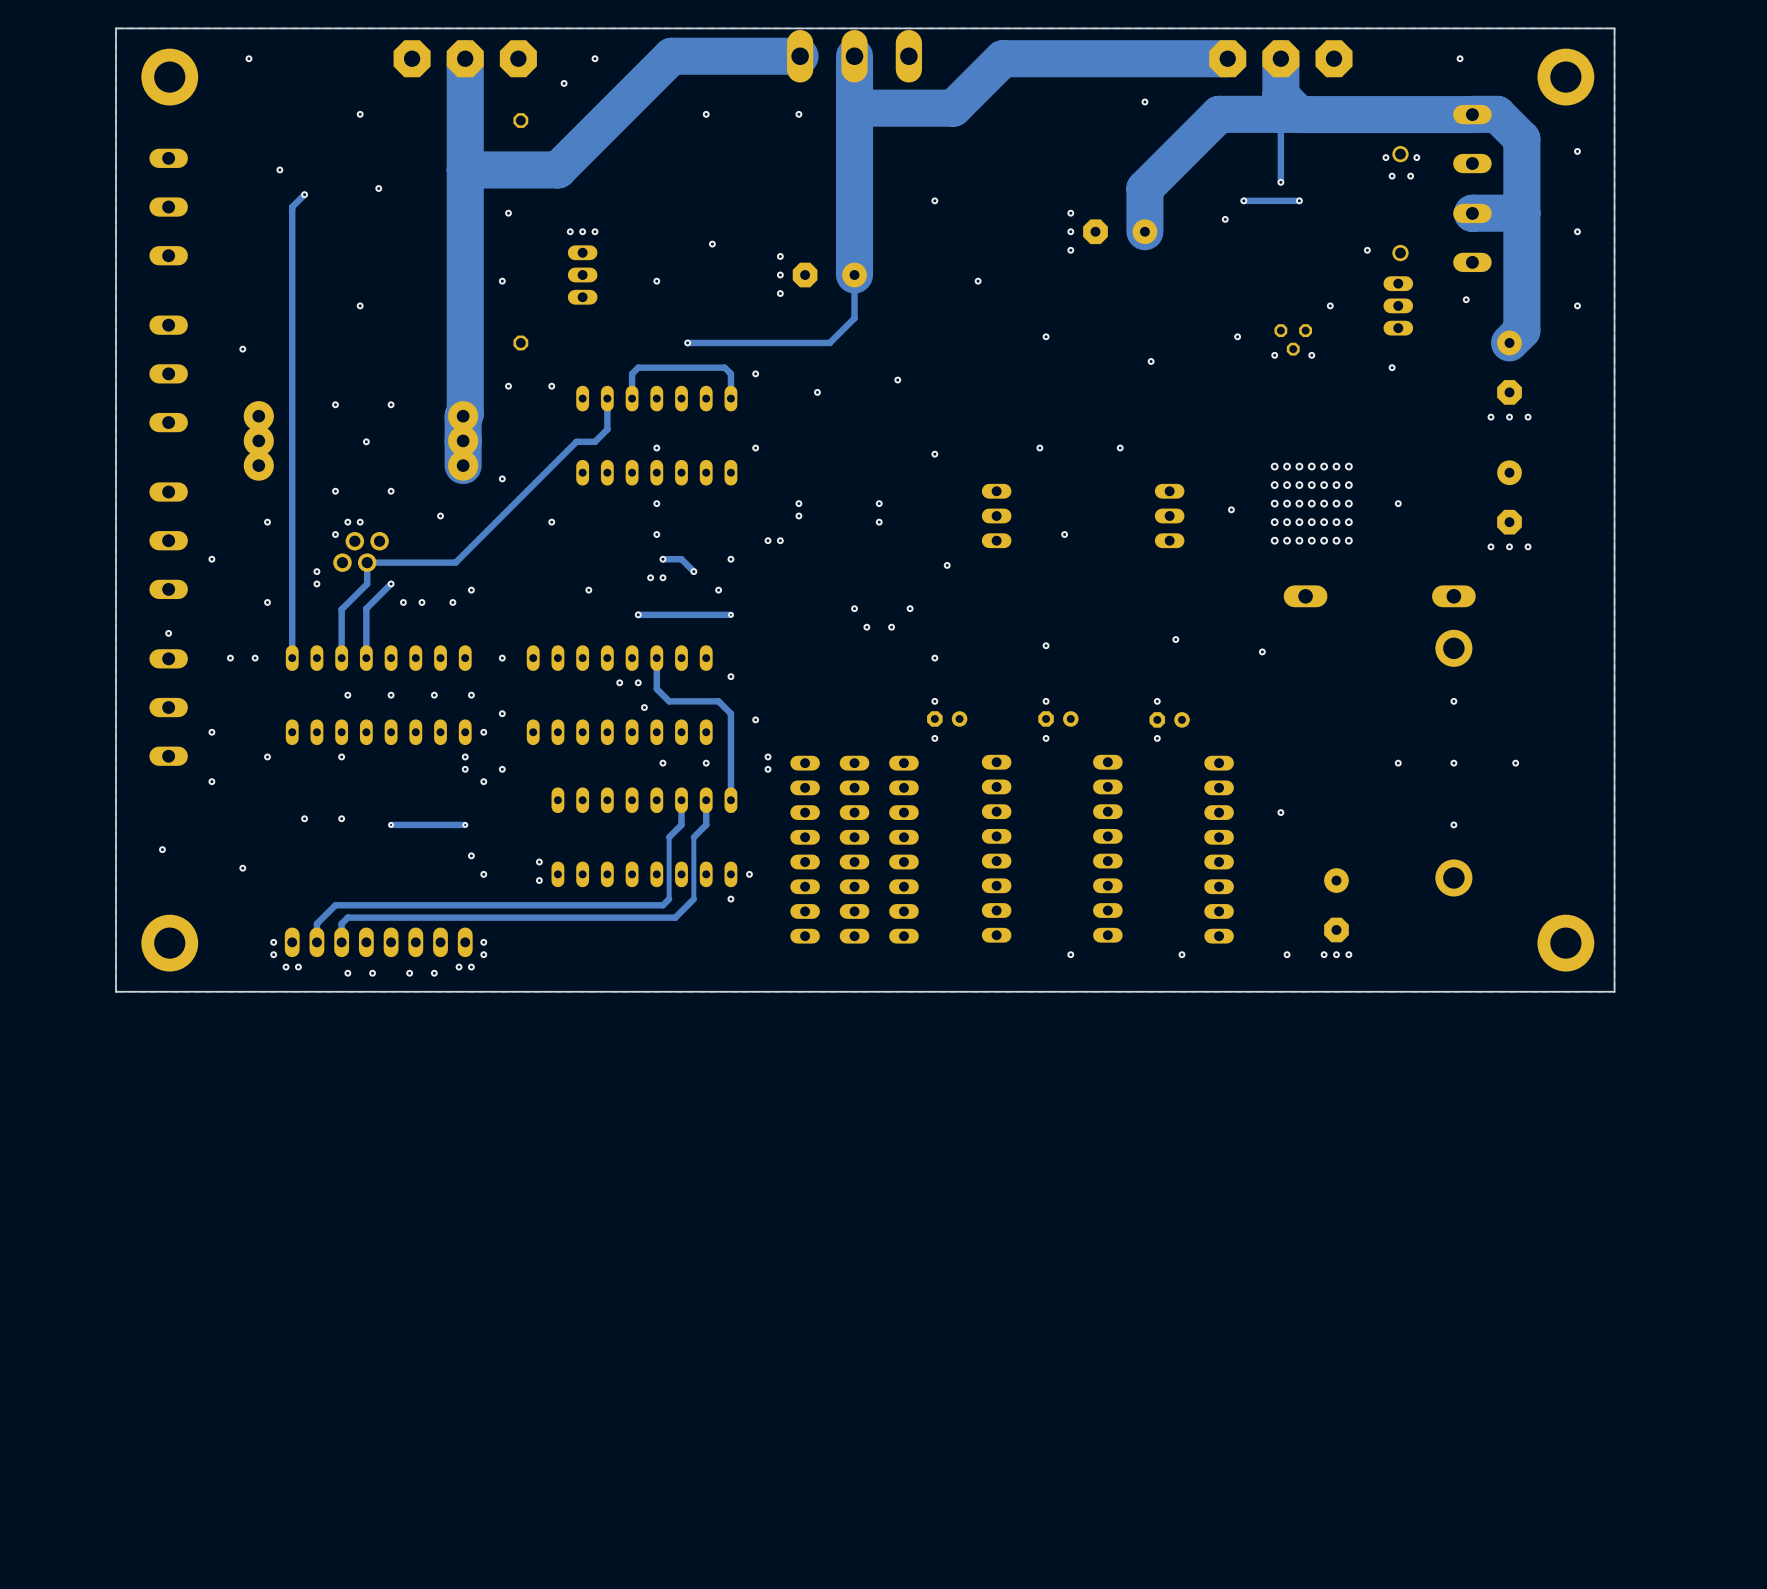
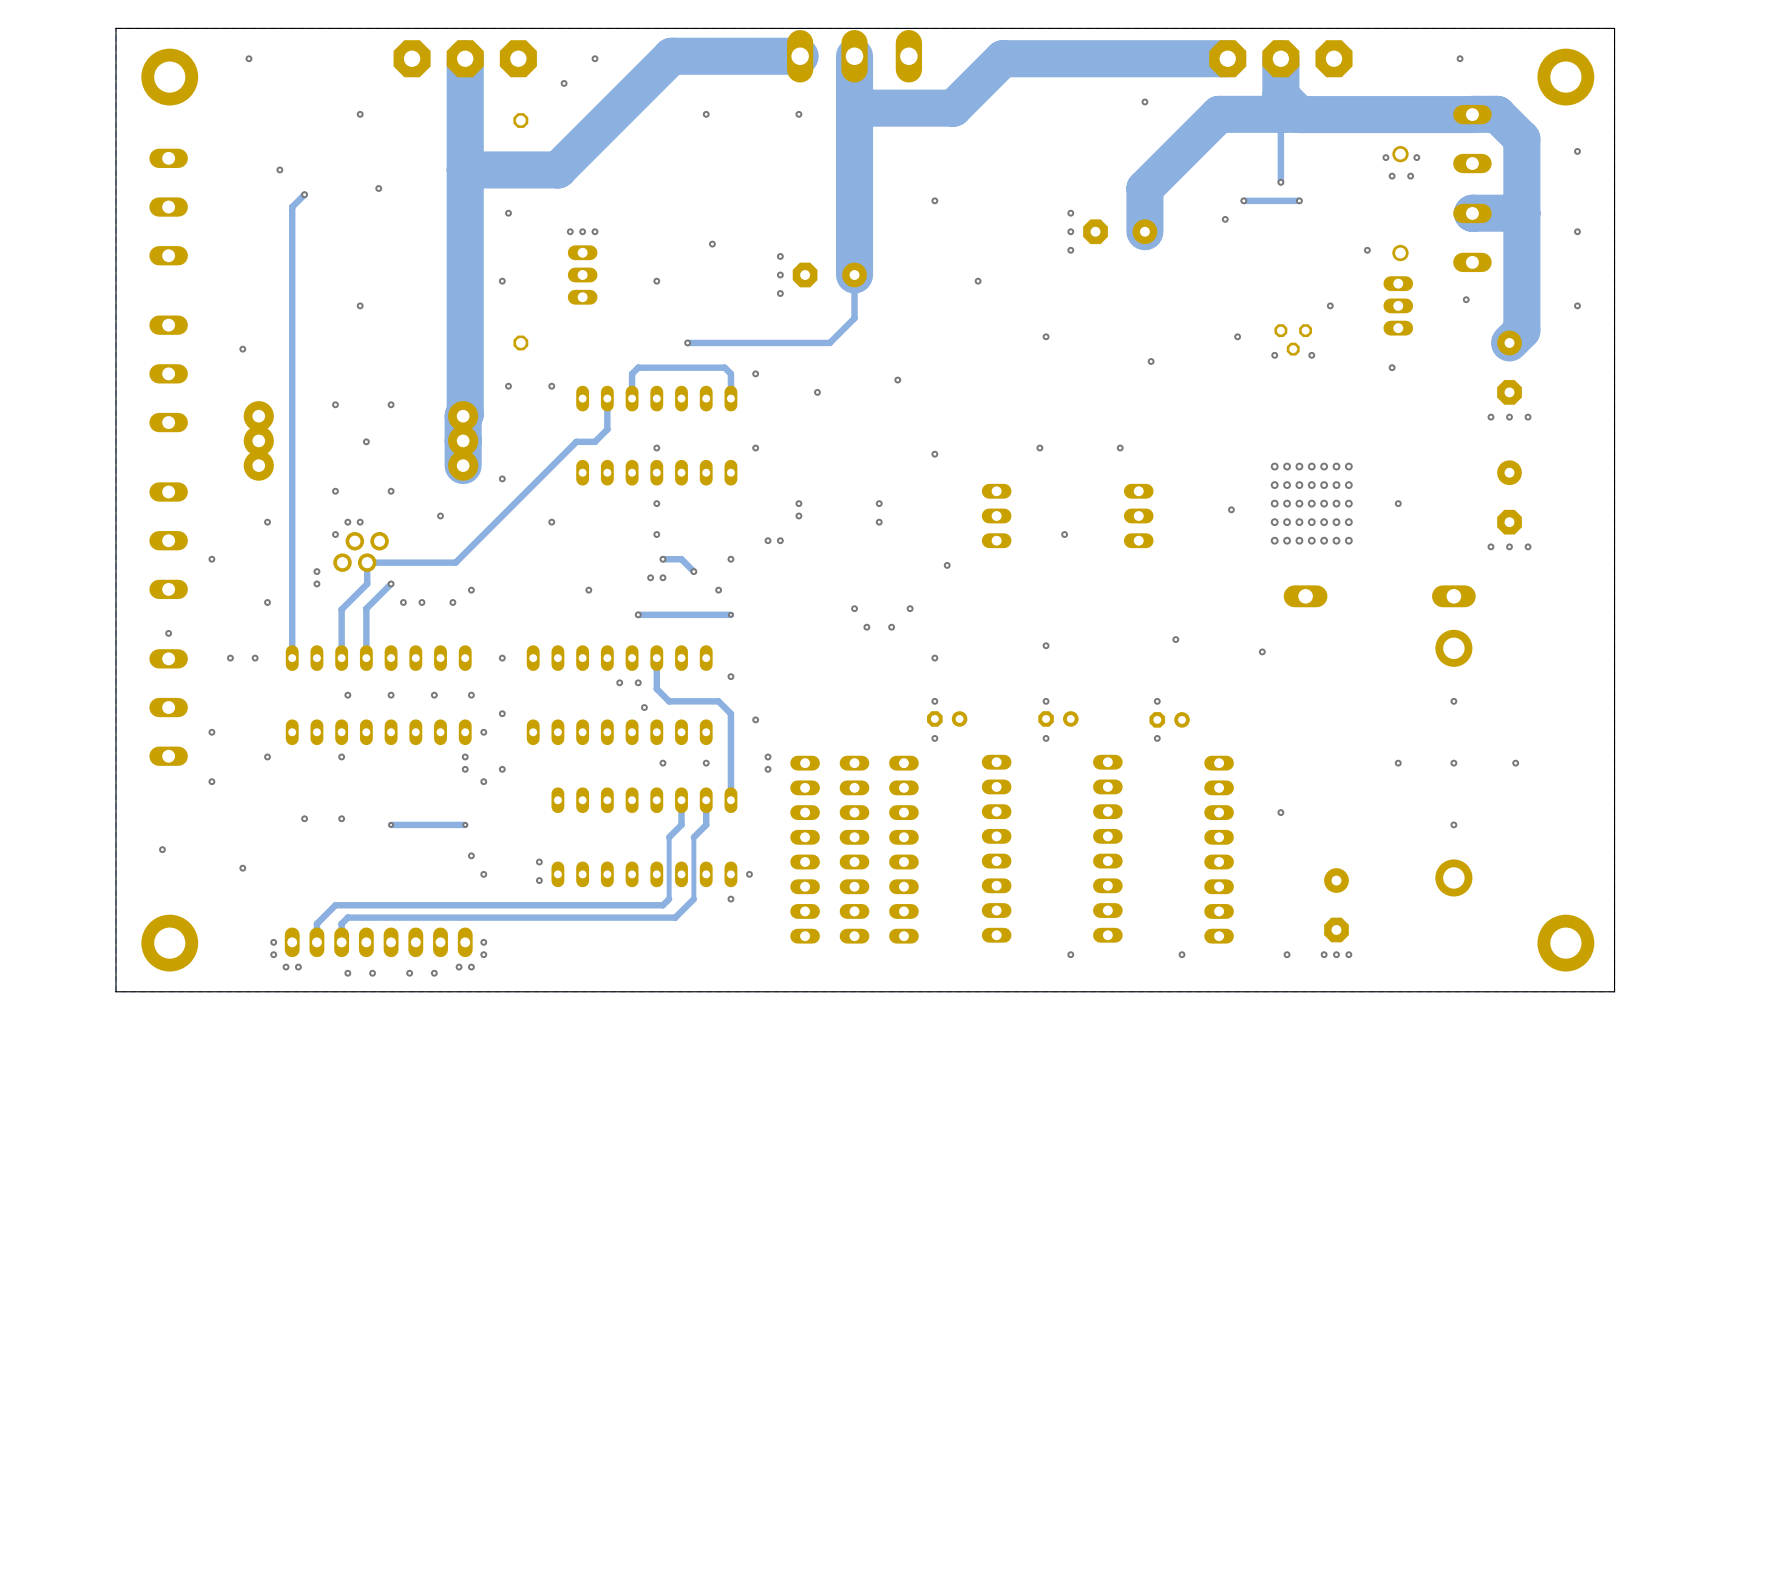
part position: (1169, 515) -> (1138, 515)

